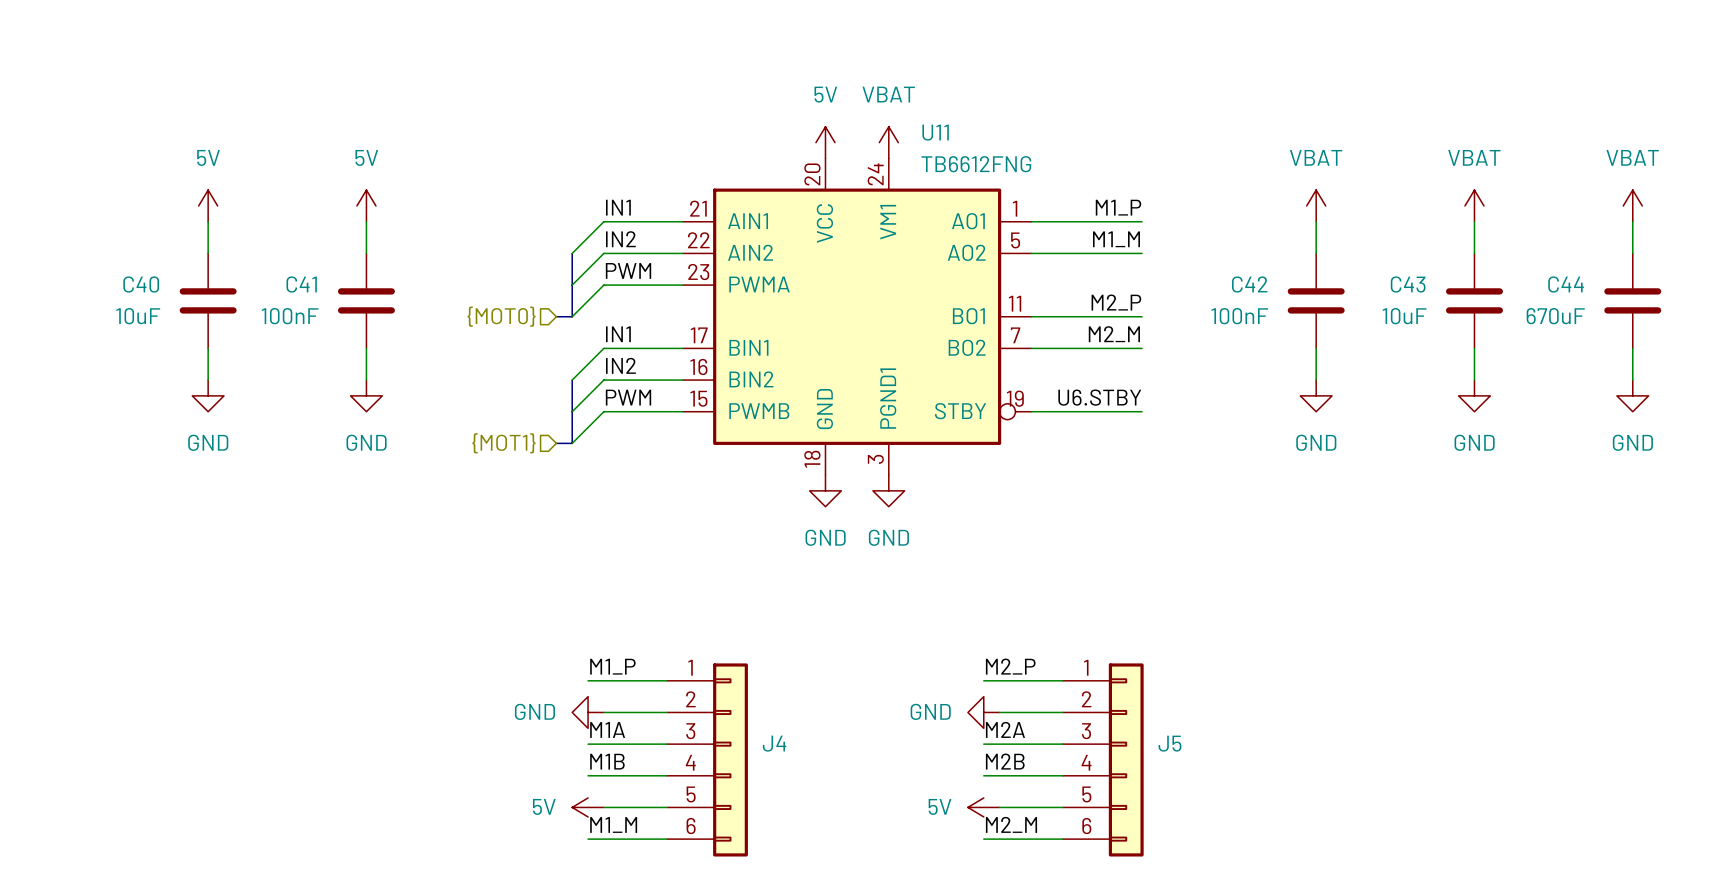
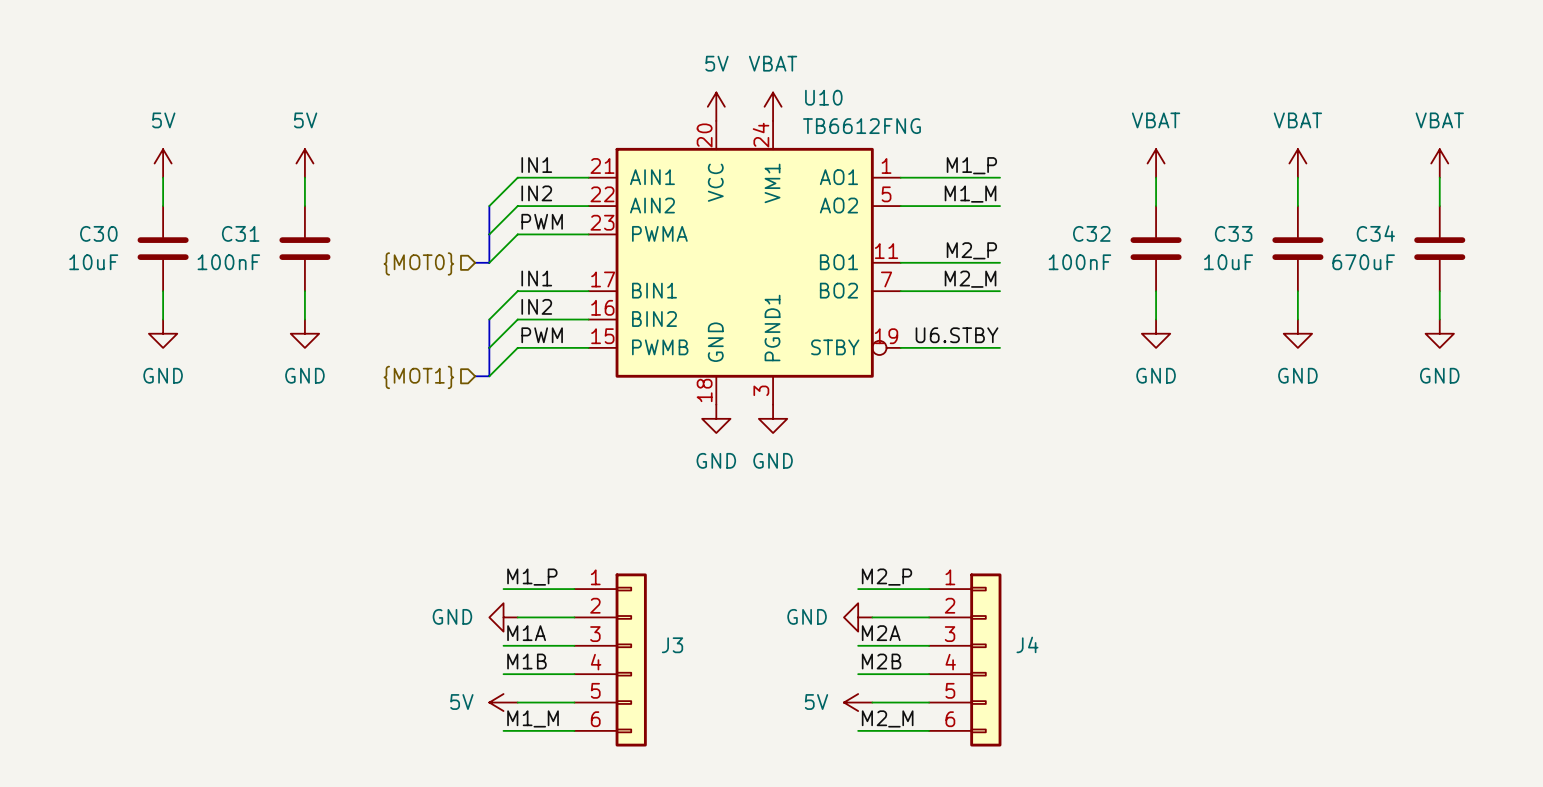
U11 name: U11 (935, 132) -> U10 (823, 97)
C40 name: C40 (141, 284) -> C30 (98, 233)
C41 name: C41 (301, 284) -> C31 (240, 233)
C42 name: C42 (1249, 284) -> C32 (1091, 233)
C43 name: C43 (1408, 284) -> C33 (1233, 233)
C44 name: C44 (1566, 284) -> C34 (1375, 233)
J4 name: J4 (774, 743) -> J3 (672, 645)
J5 name: J5 (1169, 743) -> J4 (1027, 644)

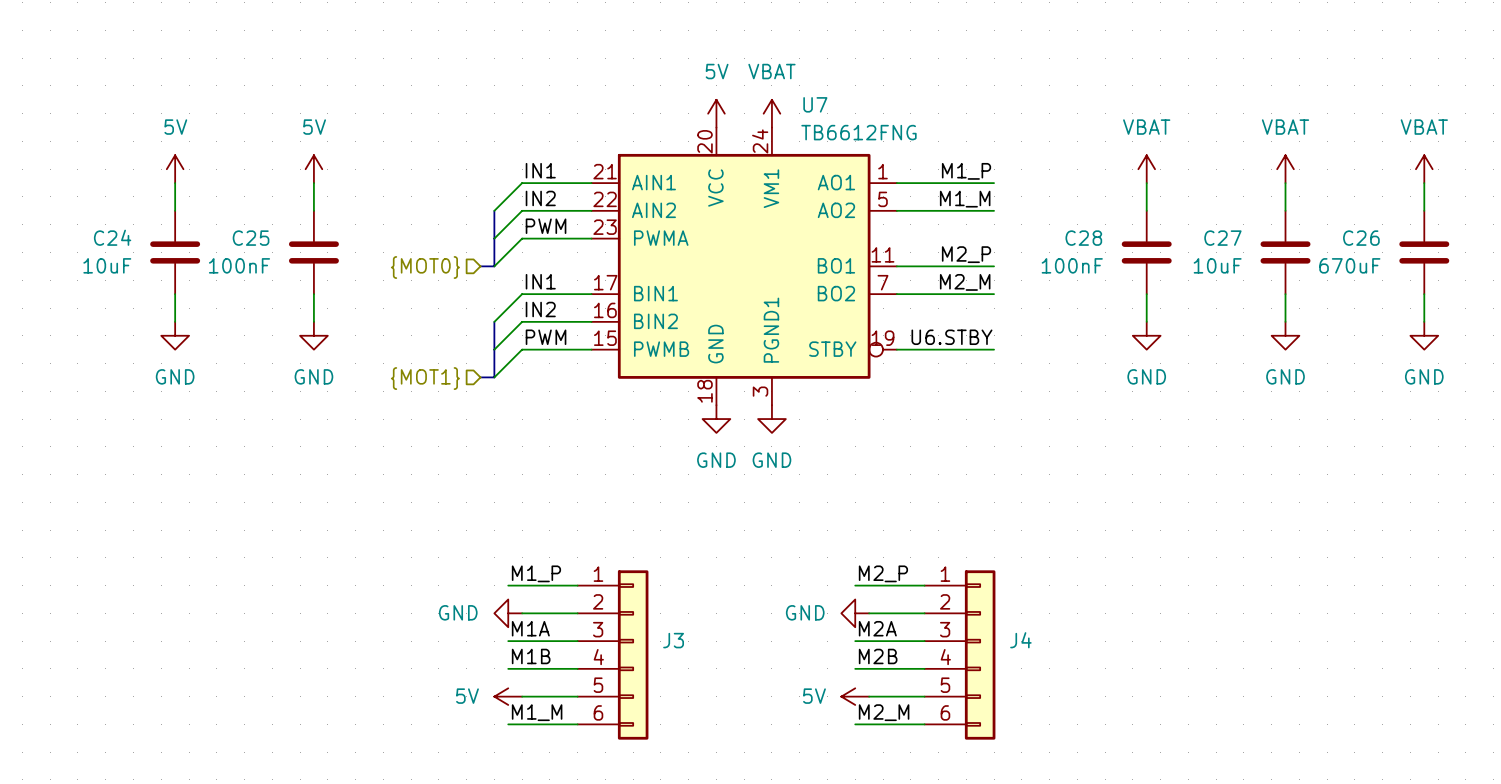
U10 name: U10 (823, 97) -> U7 (815, 104)
C30 name: C30 (98, 233) -> C24 (112, 237)
C31 name: C31 (240, 233) -> C25 (251, 238)
C32 name: C32 (1091, 233) -> C28 (1083, 238)
C33 name: C33 (1233, 233) -> C27 (1222, 238)
C34 name: C34 (1375, 233) -> C26 (1361, 238)

